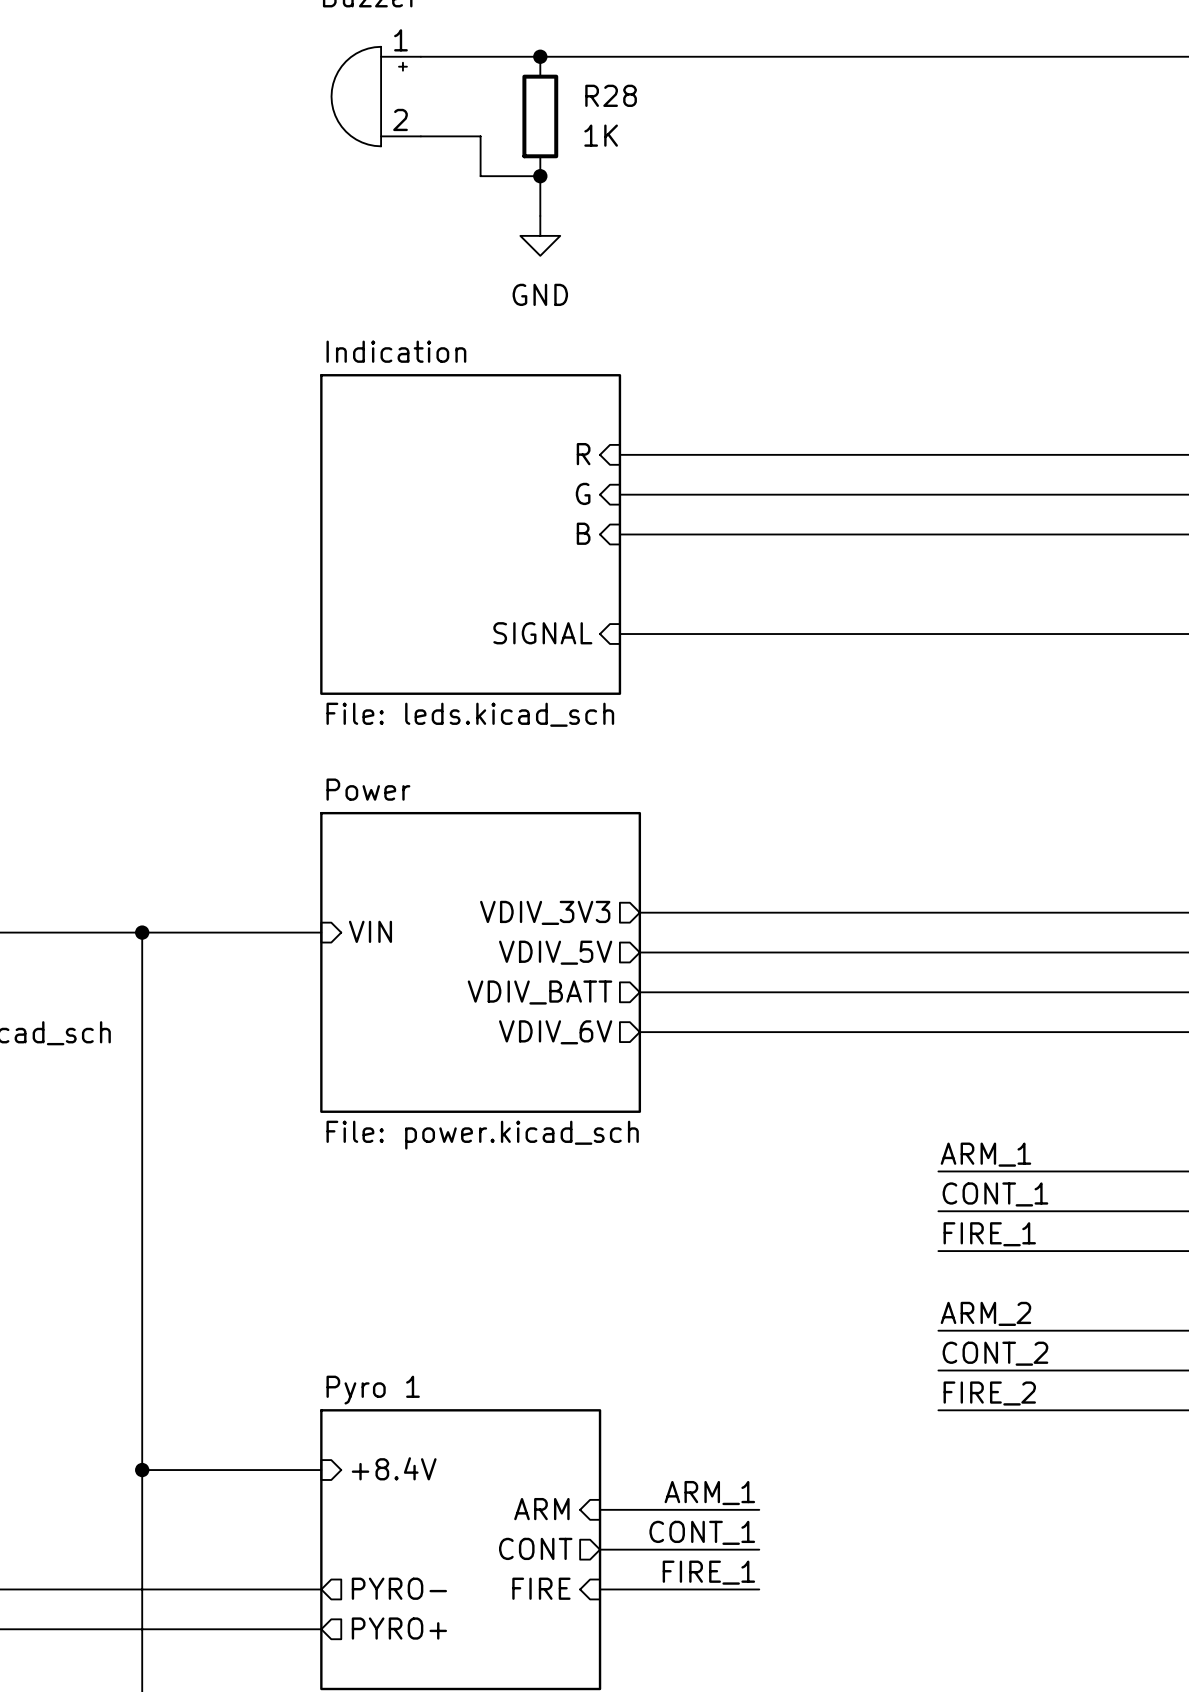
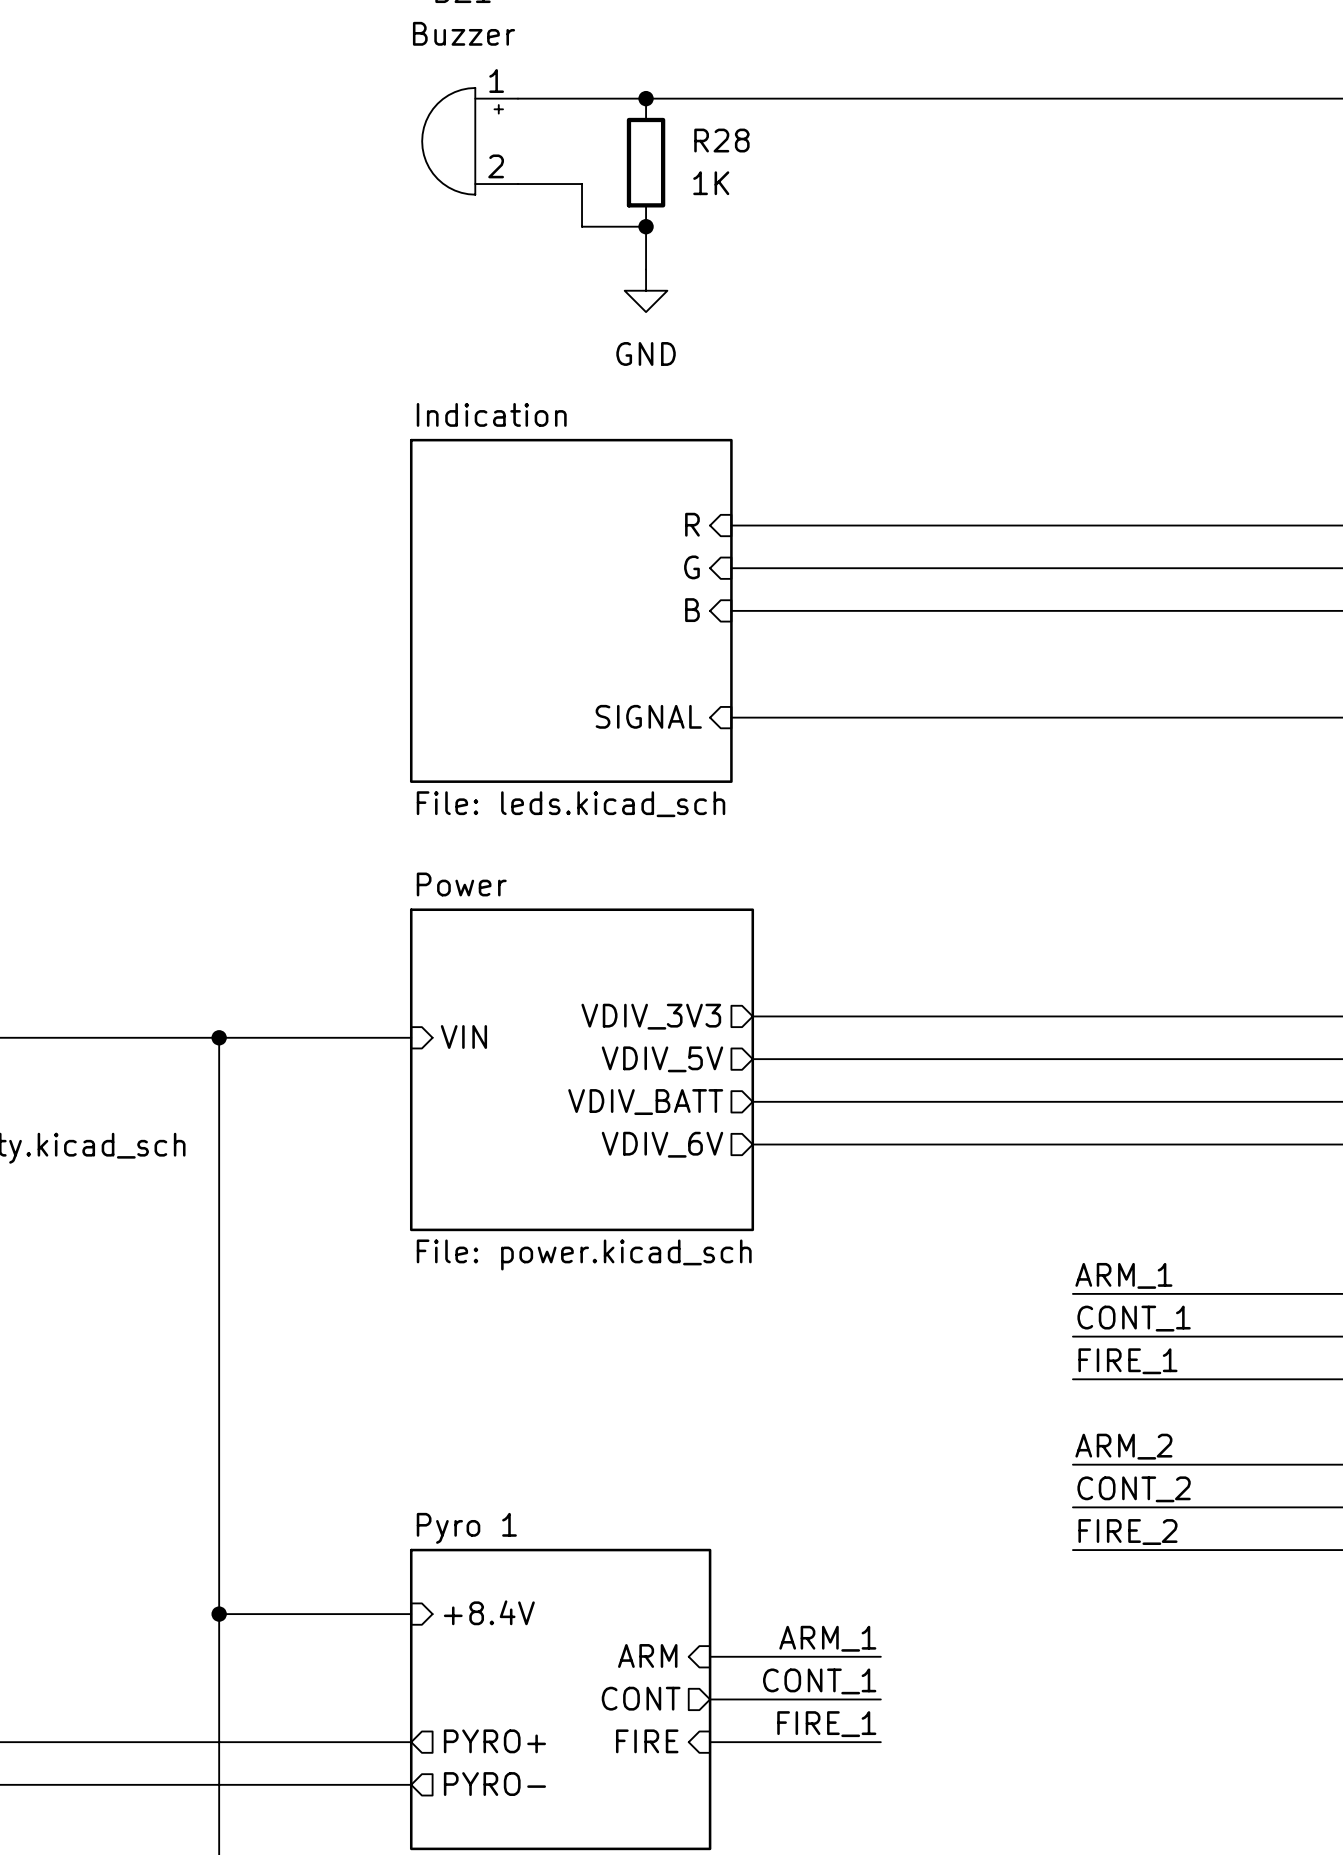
sheet pin: PYRO- (399, 1588) -> PYRO+ (494, 1741)
sheet pin: PYRO+ (399, 1628) -> PYRO- (494, 1784)

